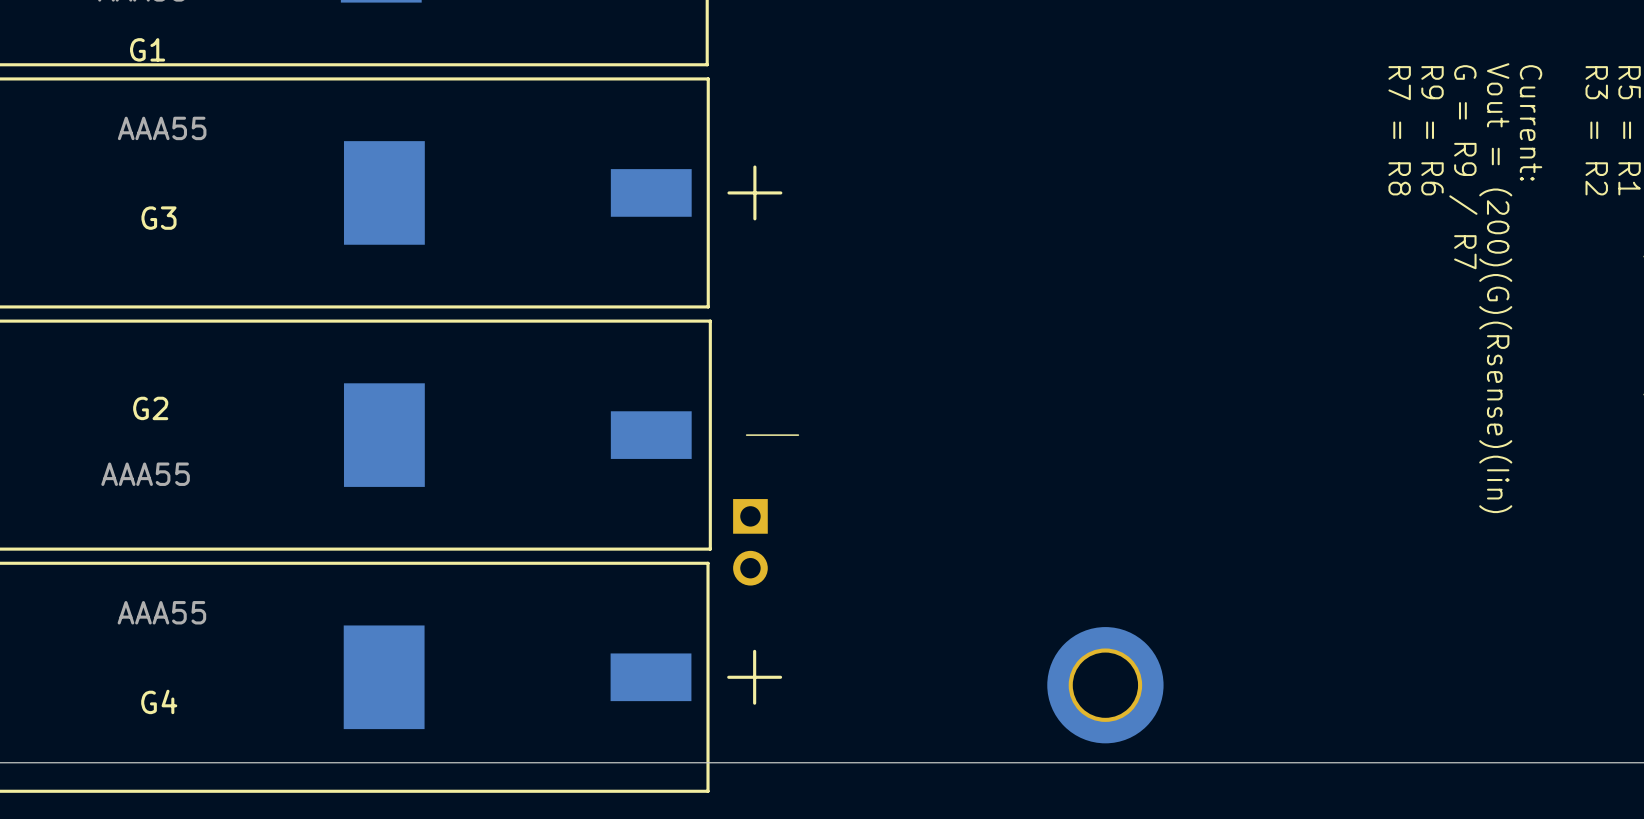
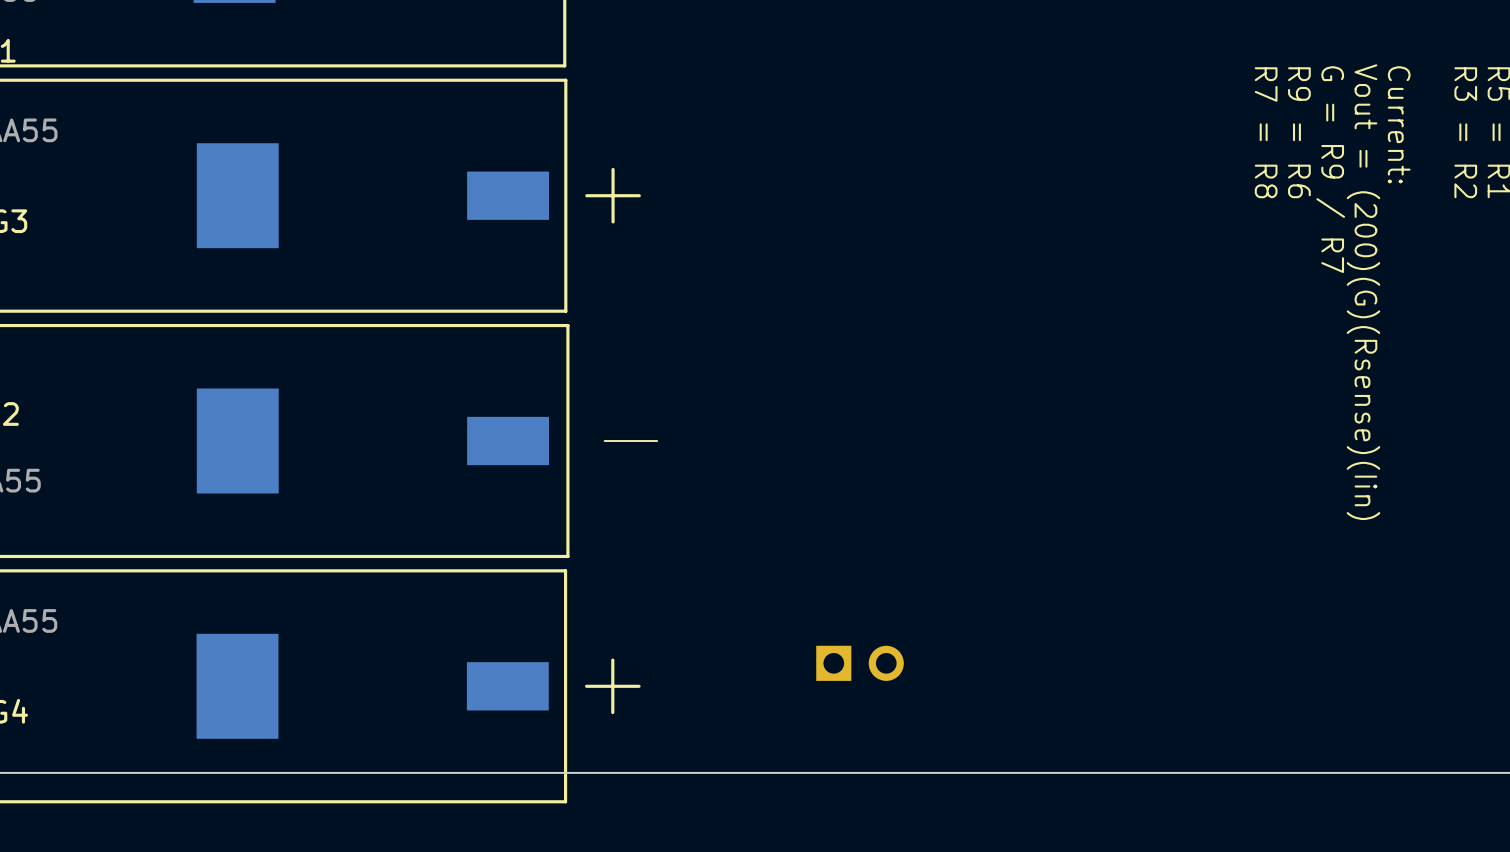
part rotation: 0° (750, 542) -> 90° counterclockwise (860, 663)
part position: (750, 542) -> (860, 663)
part: (1105, 685) -> none

